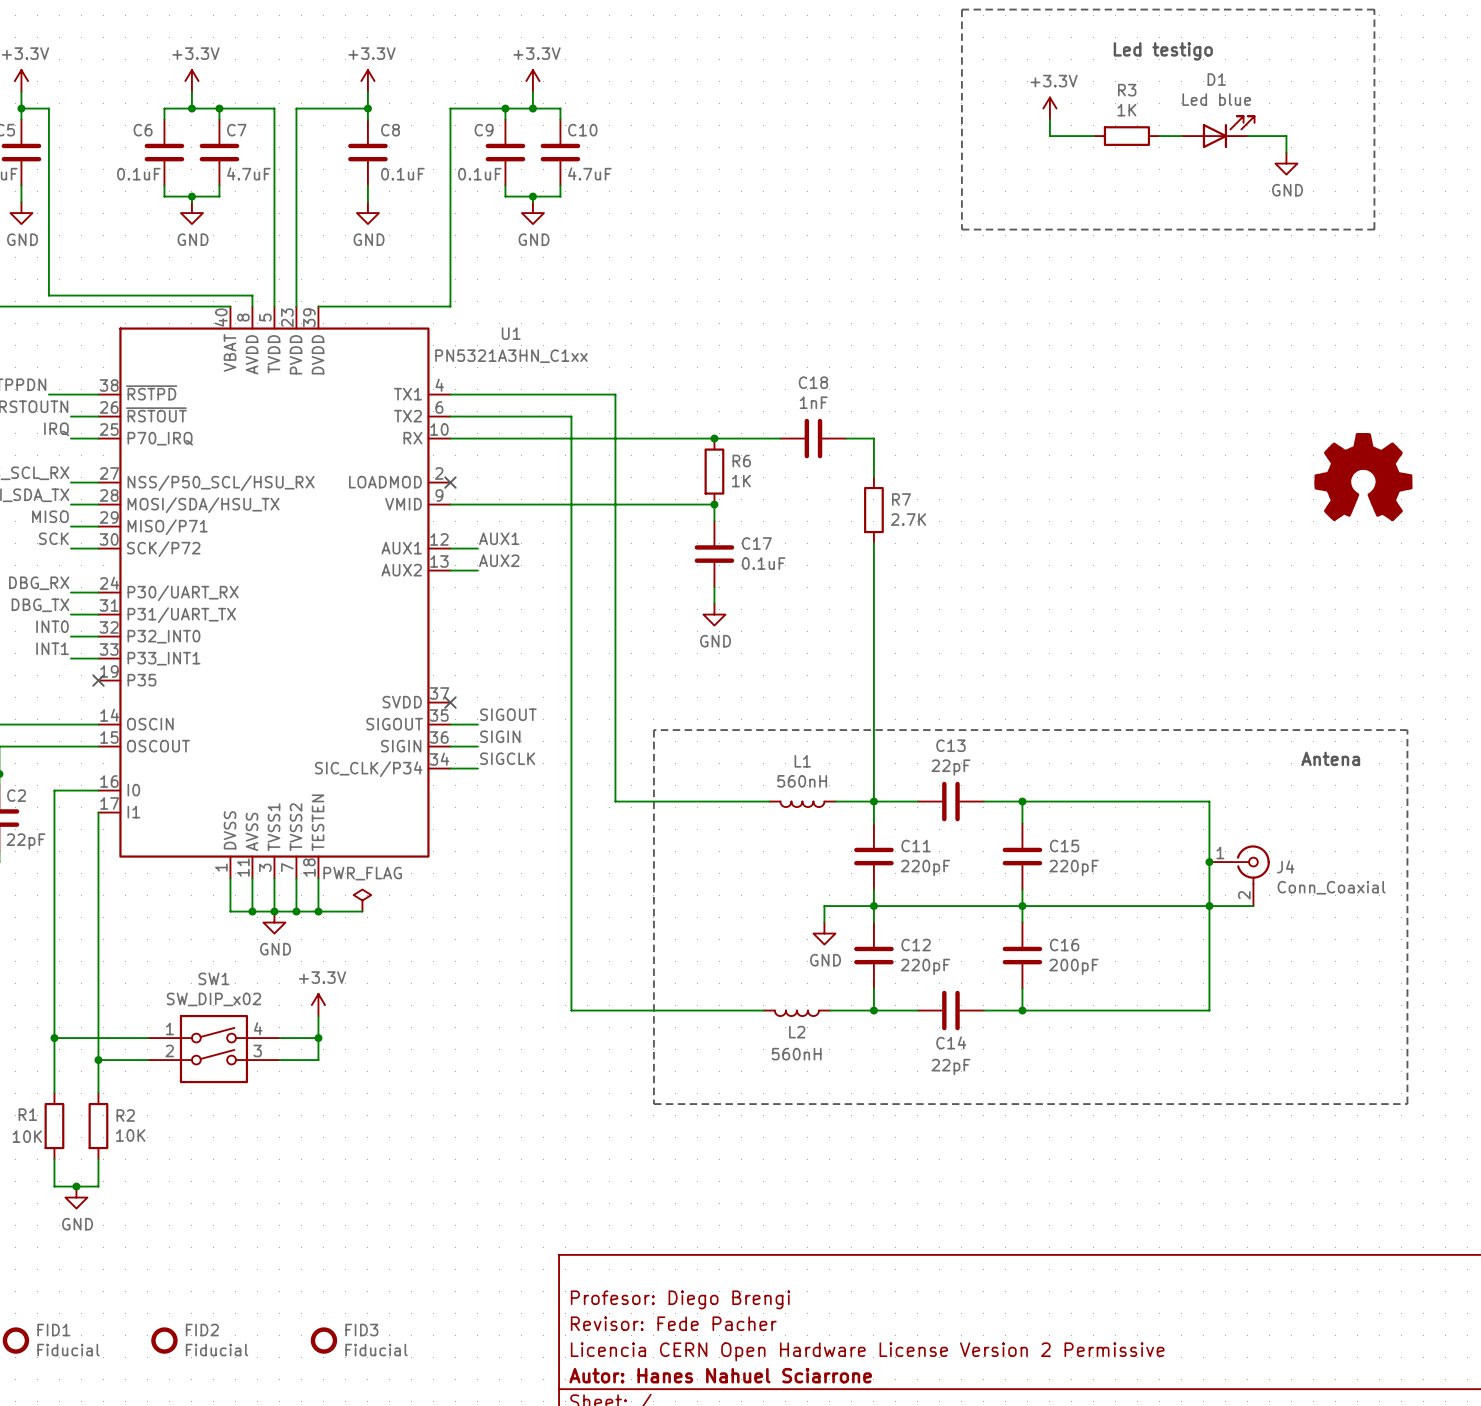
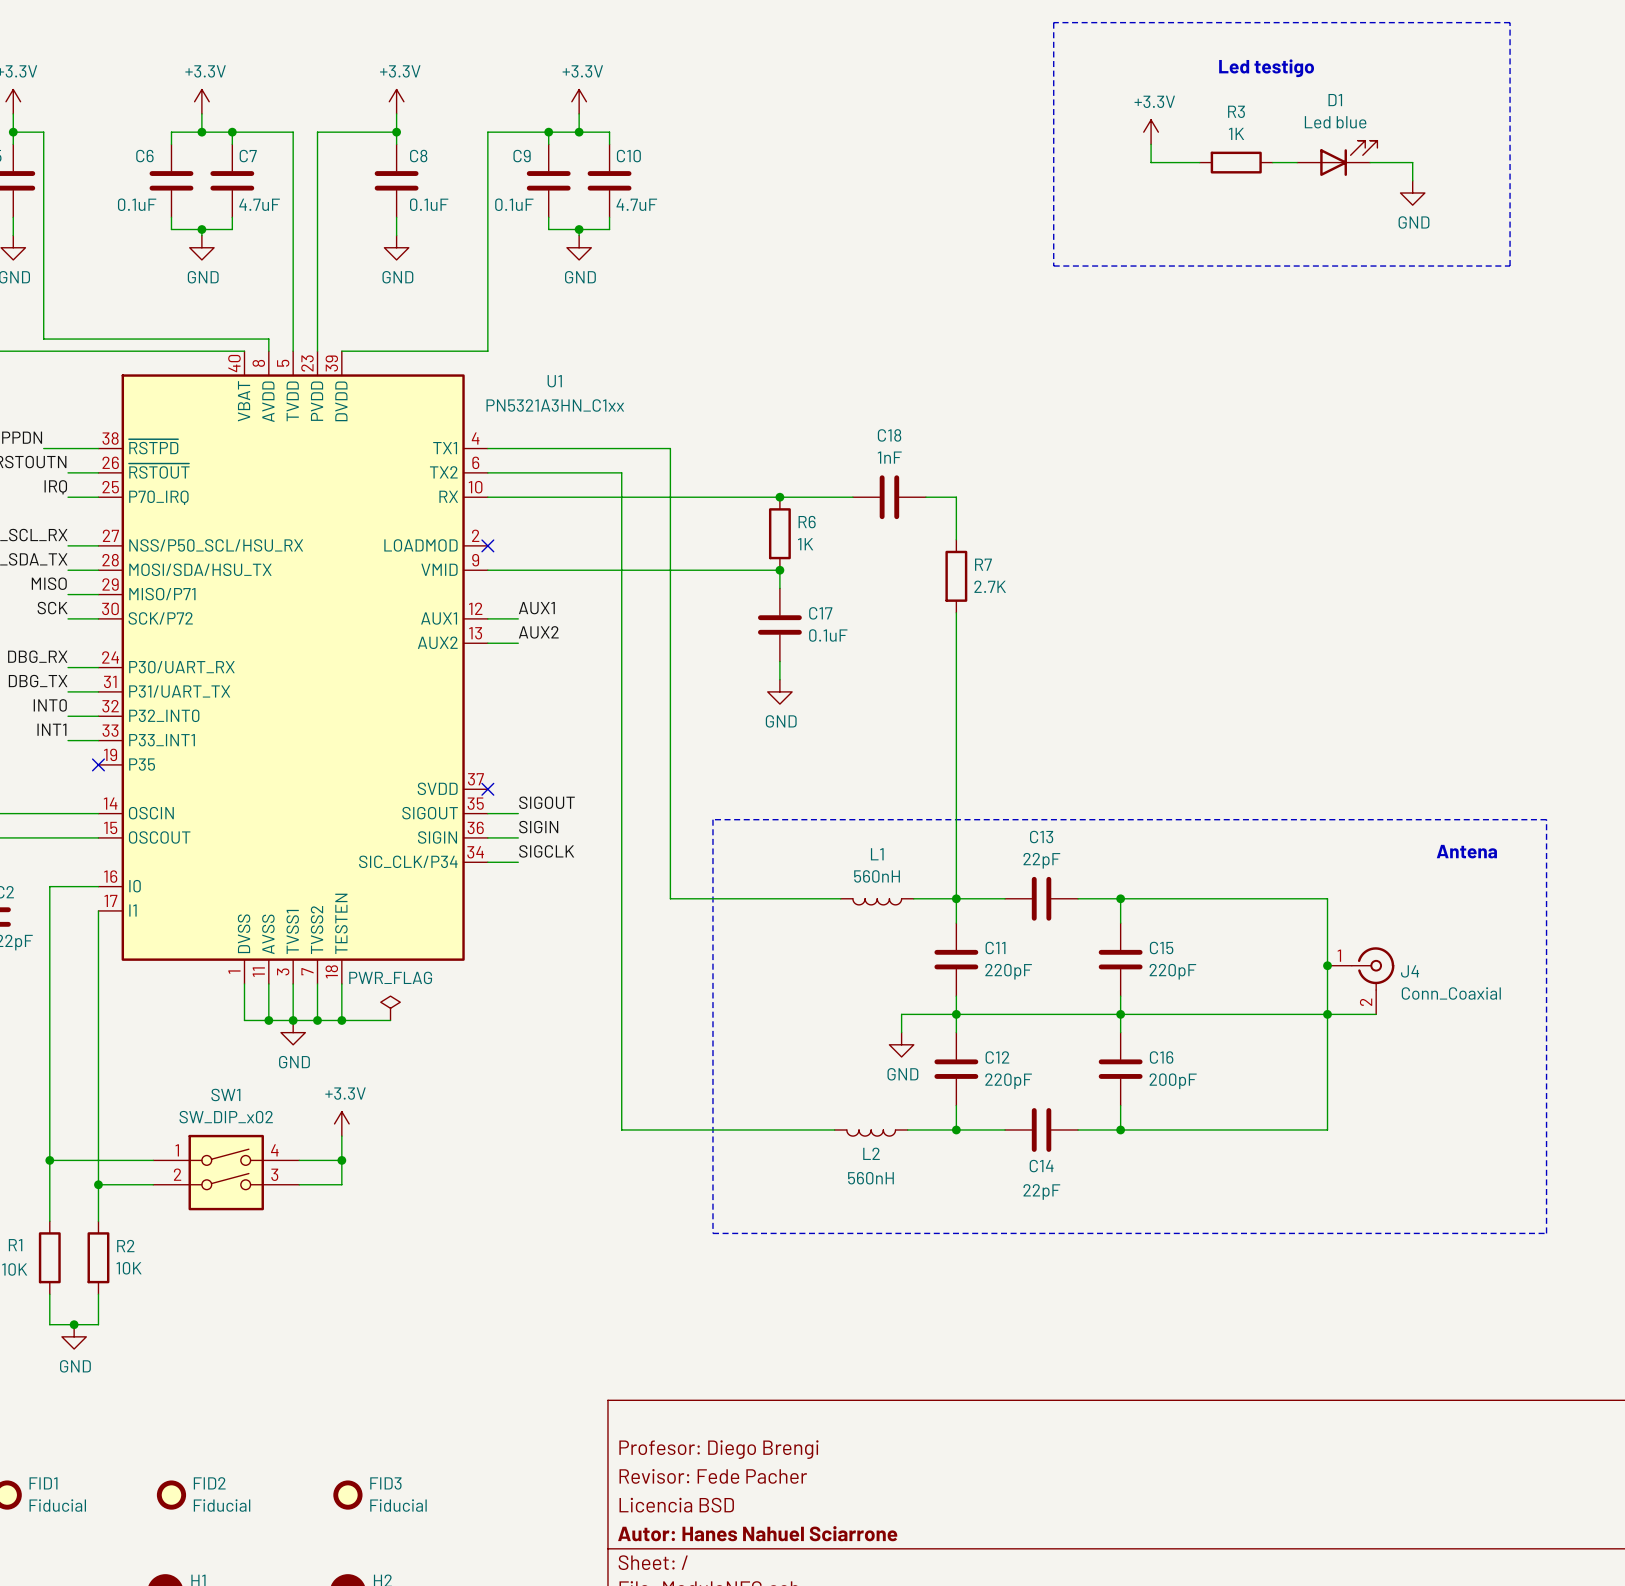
part: (1363, 477) -> none
title block: Licencia CERN Open Hardware License Version 2 Permissive (867, 1351) -> Licencia BSD (676, 1505)

